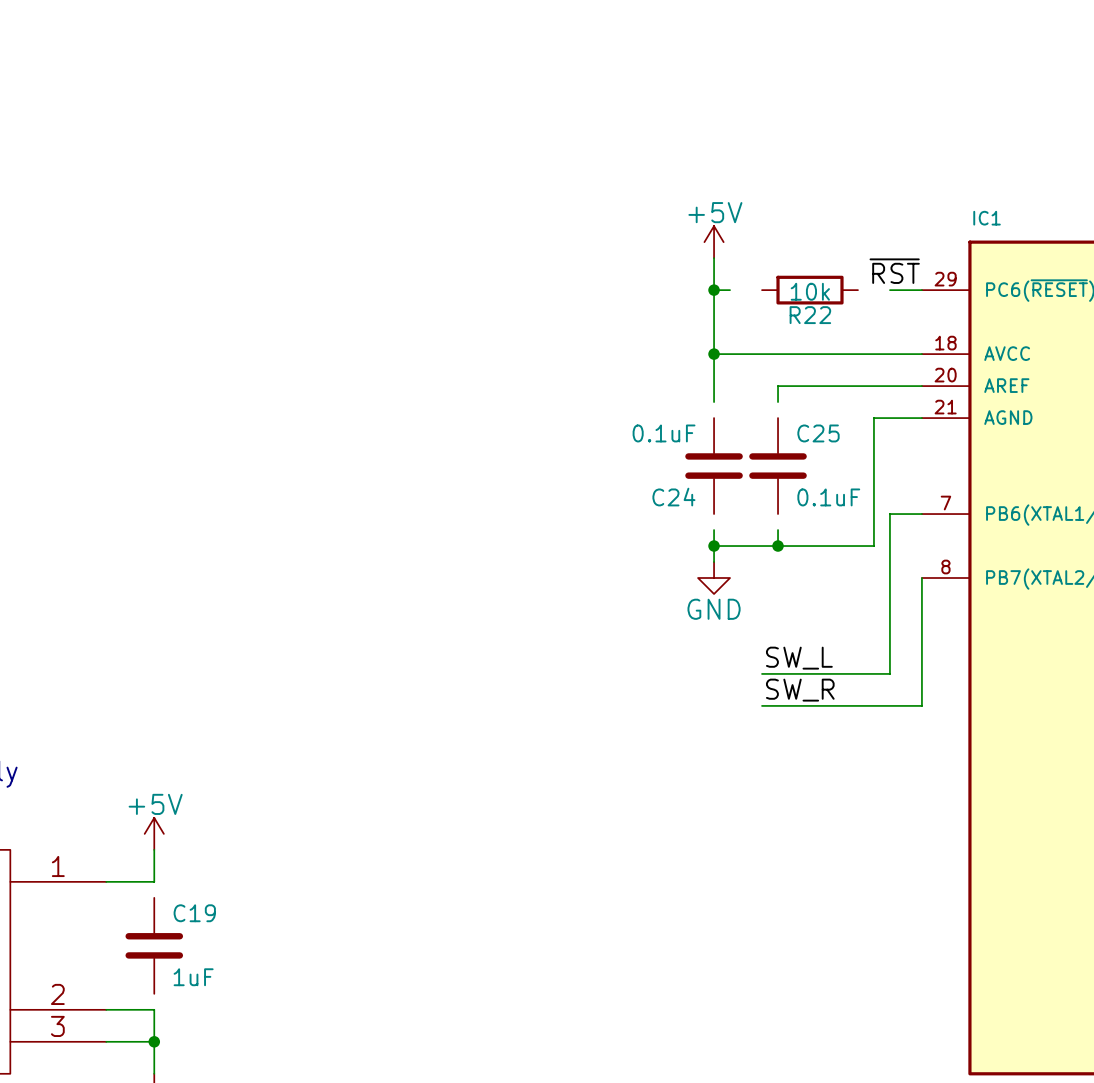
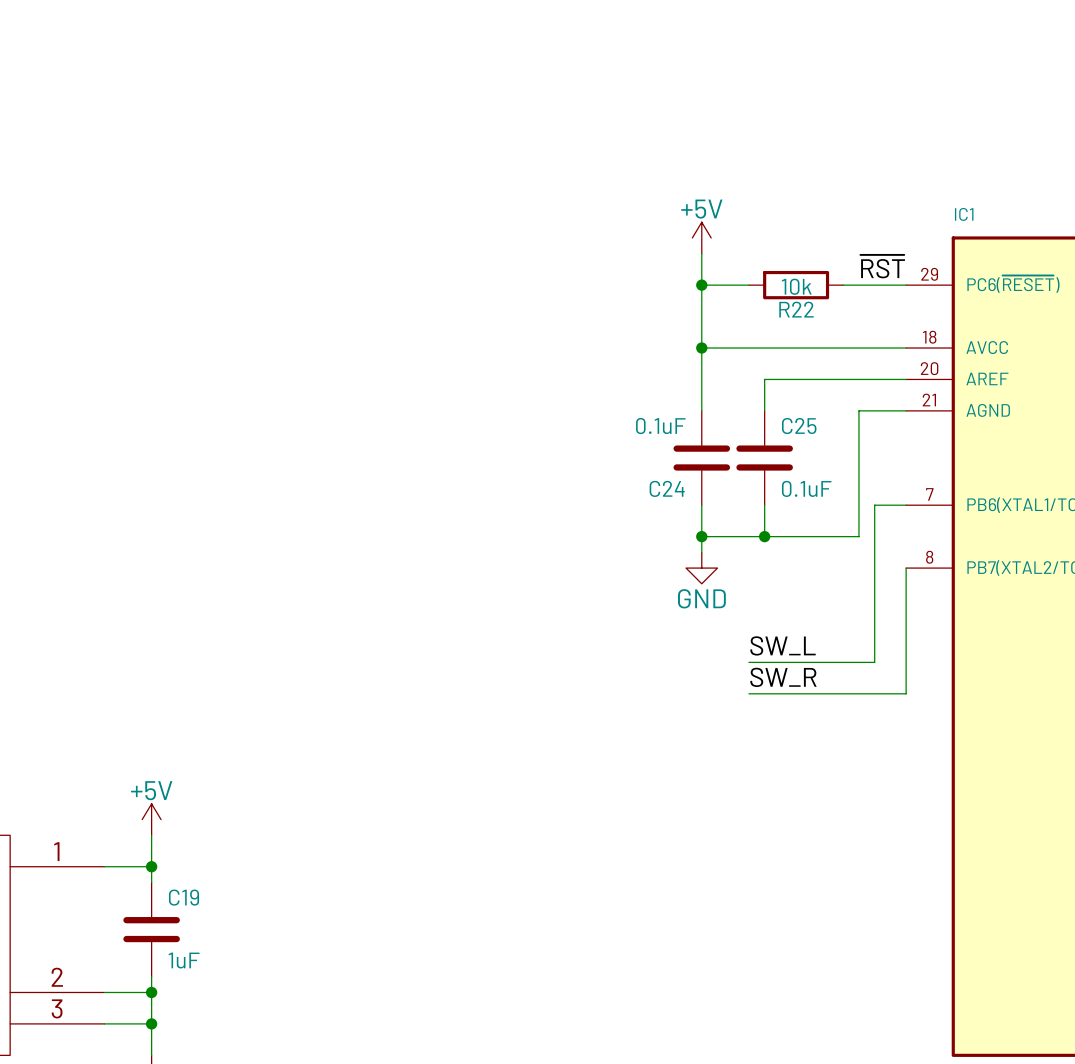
wire: none -> (717, 285) (748, 285)
wire: none -> (843, 285) (874, 285)
wire: none -> (701, 395) (701, 410)
wire: none -> (764, 395) (764, 410)
wire: none -> (701, 505) (701, 520)
wire: none -> (764, 505) (764, 520)
wire: none -> (151, 866) (151, 882)
junction: none -> (151, 866)
wire: none -> (151, 976) (151, 992)
junction: none -> (151, 992)

